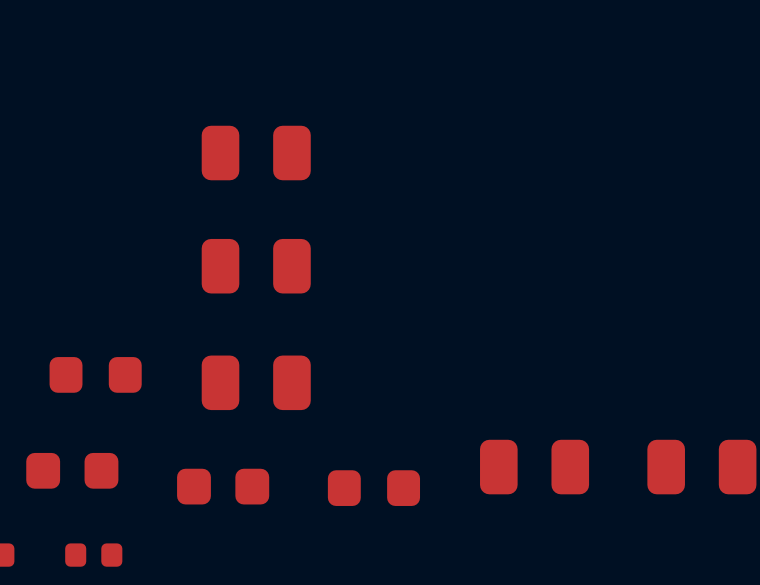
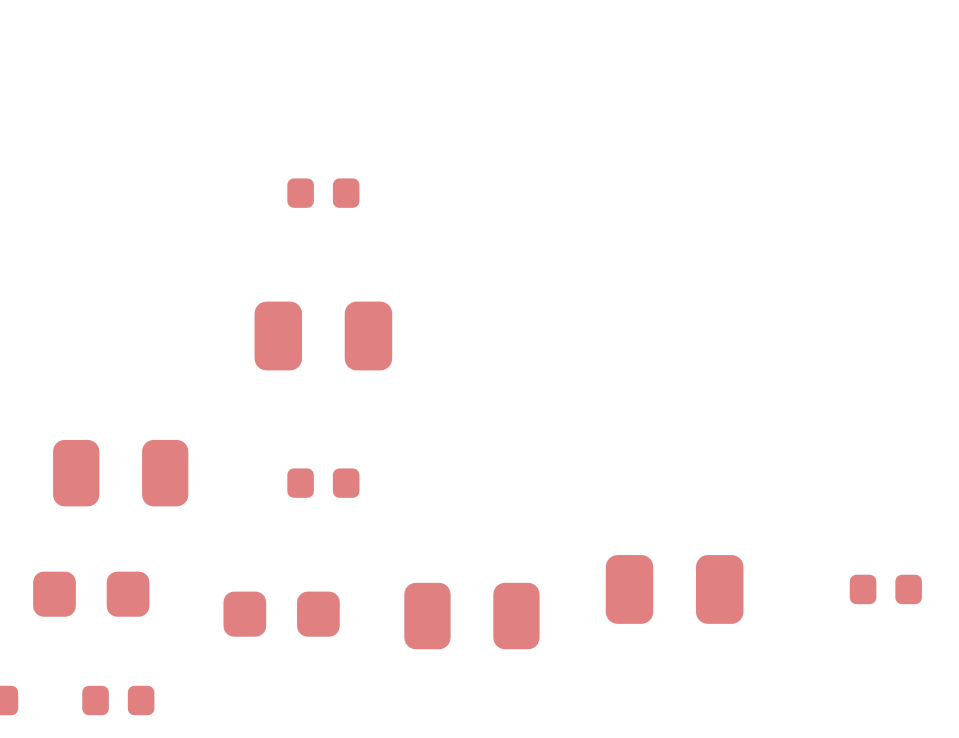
part footprint: [201, 125, 311, 181] -> [287, 178, 360, 208]
part footprint: [201, 355, 311, 411] -> [287, 468, 360, 498]
part footprint: [49, 357, 142, 393] -> [53, 439, 189, 507]
part footprint: [647, 439, 757, 495] -> [849, 574, 922, 605]
part footprint: [327, 470, 421, 506] -> [404, 582, 540, 650]

